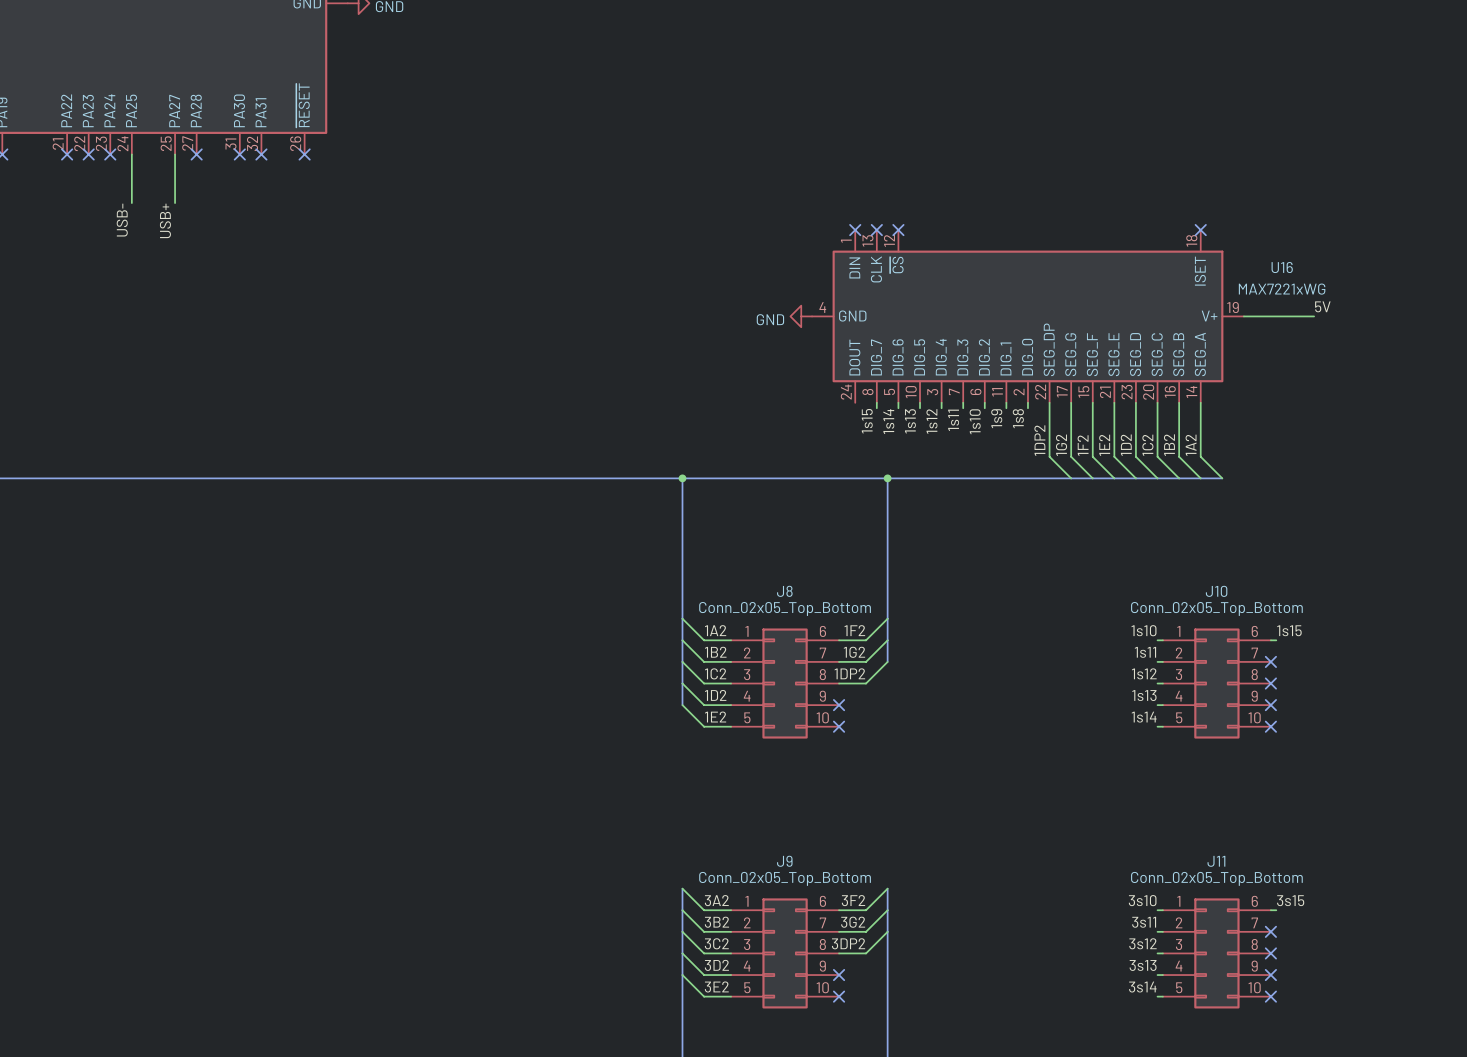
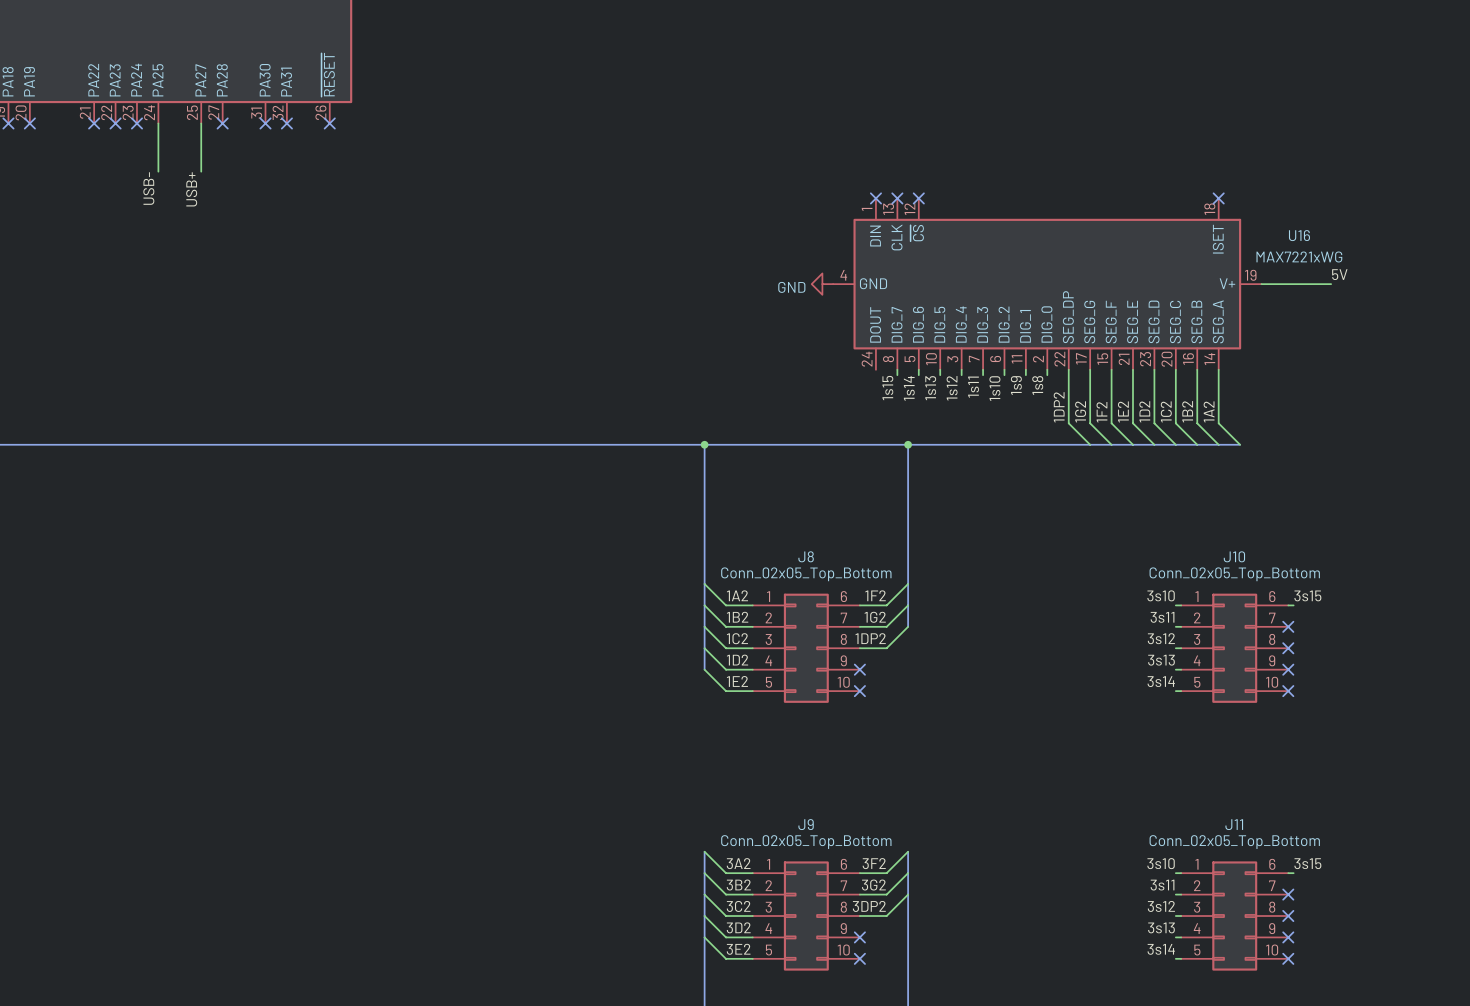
label: 1s10 (1143, 630) -> 3s10 (1161, 595)
label: 1s15 (1289, 630) -> 3s15 (1307, 595)
label: 1s11 (1145, 652) -> 3s11 (1162, 617)
label: 1s12 (1144, 673) -> 3s12 (1161, 638)
label: 1s13 (1144, 695) -> 3s13 (1161, 660)
label: 1s14 (1144, 717) -> 3s14 (1161, 681)

